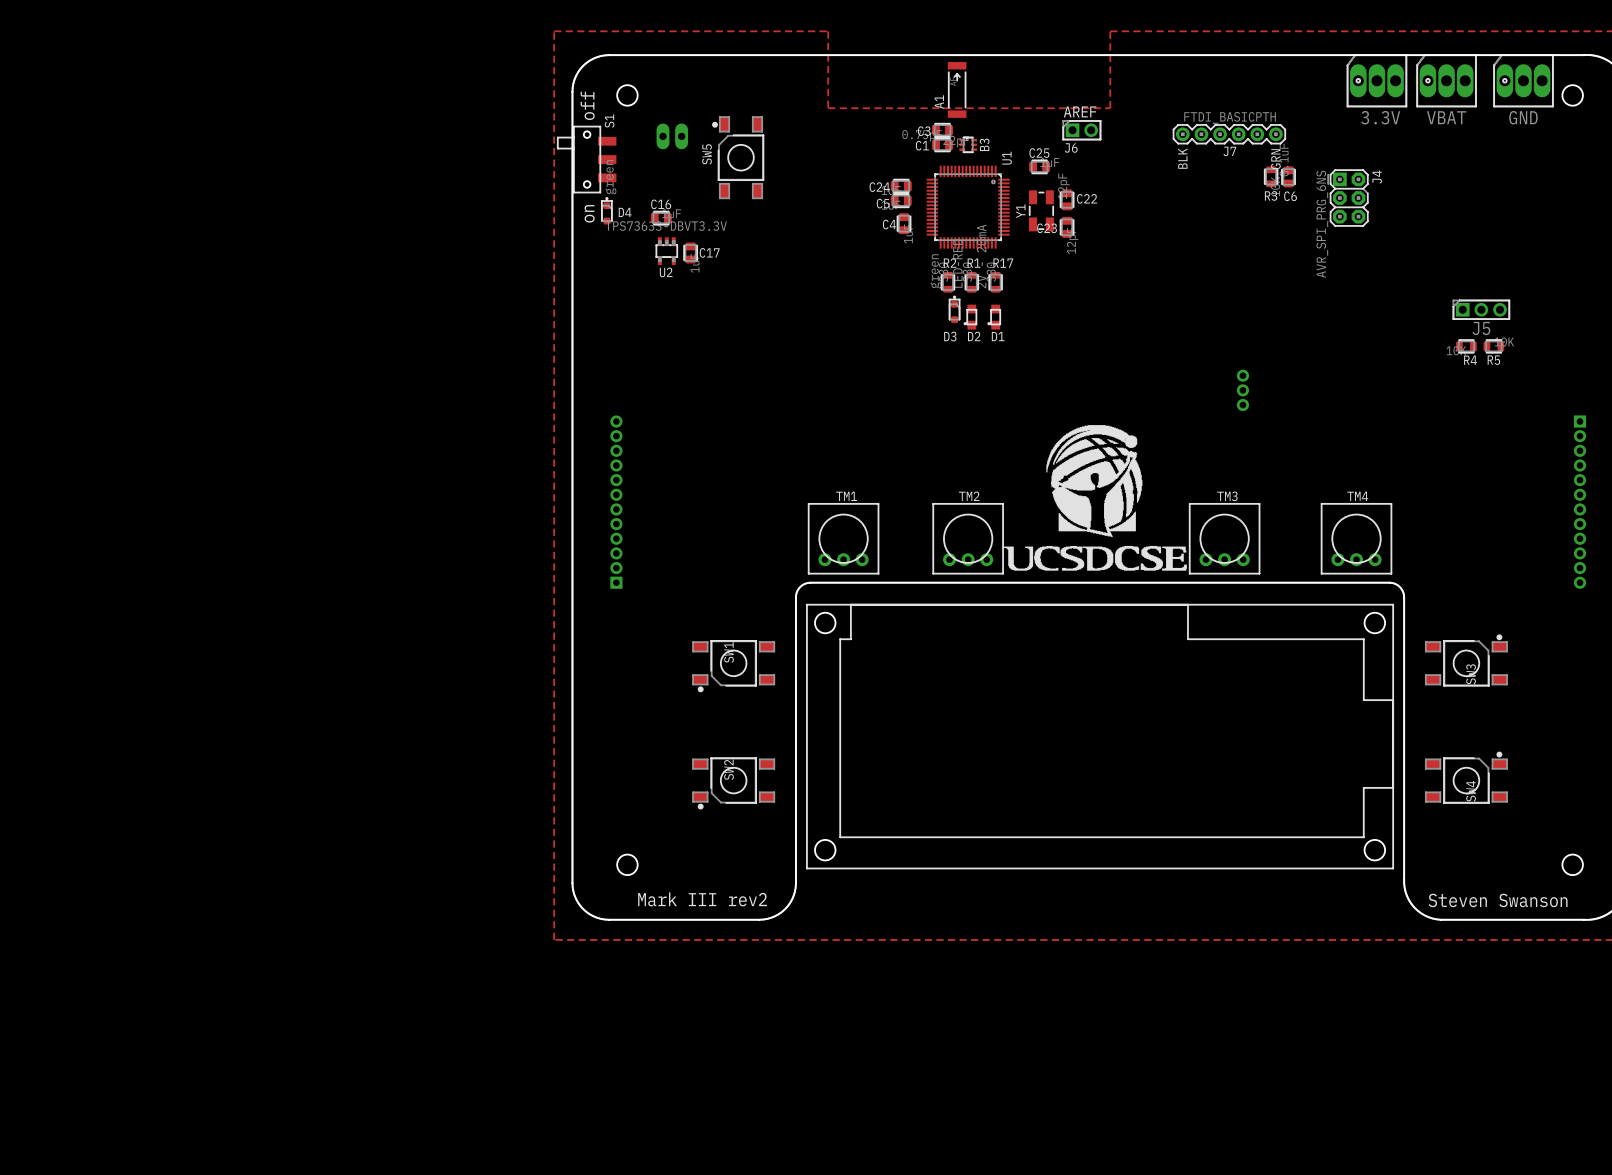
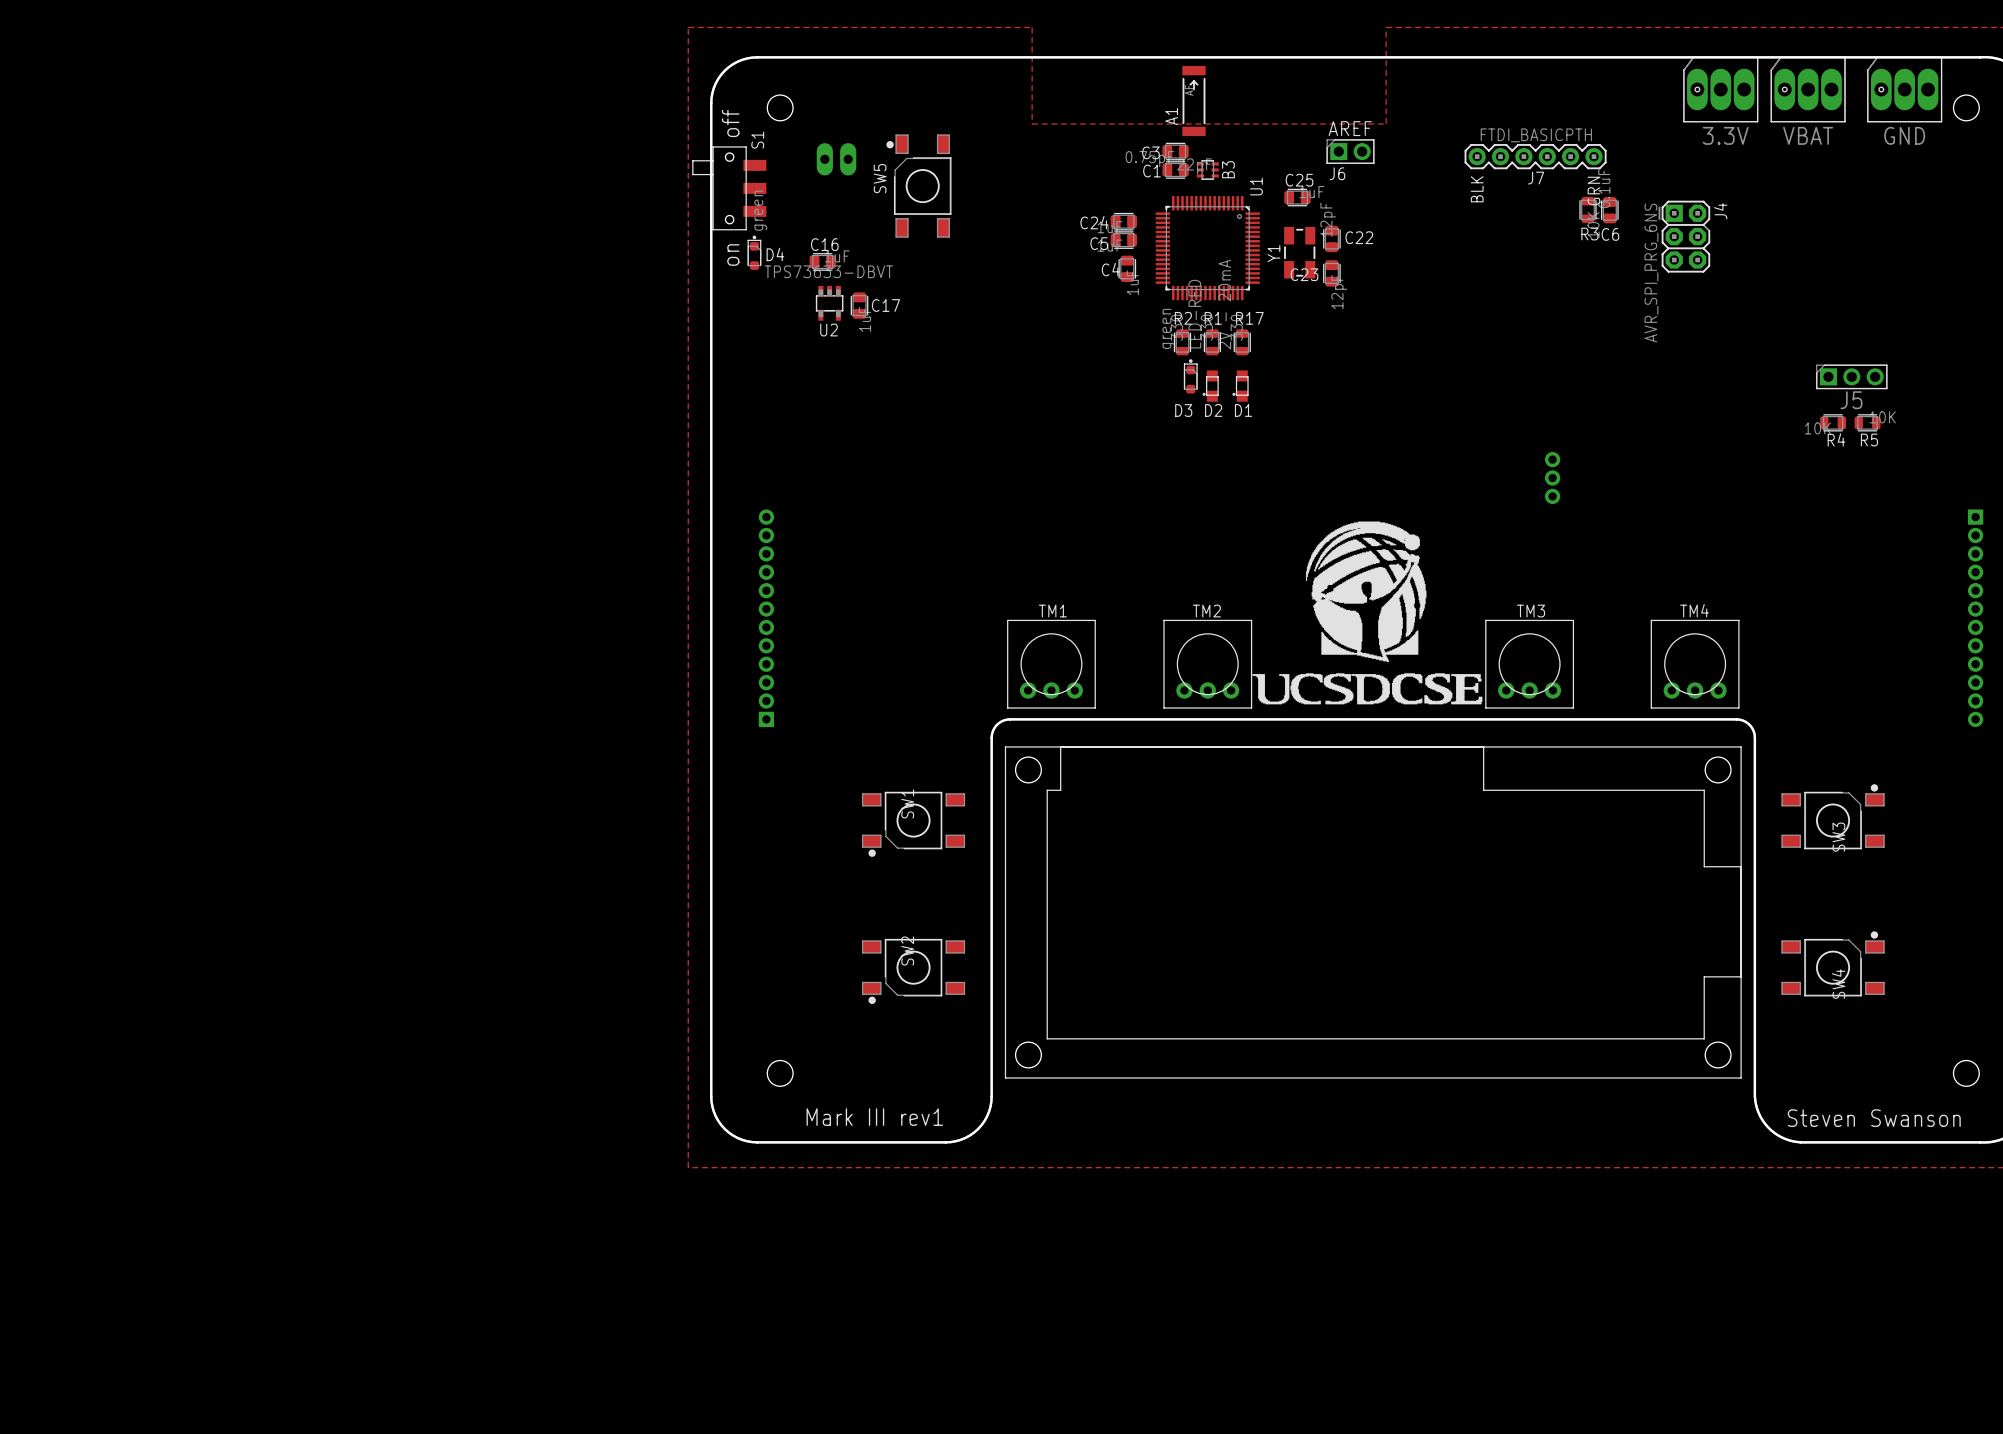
U2 value: TPS73633-DBVT3.3V (666, 226) -> TPS73633-DBVT (828, 271)
text: Mark III rev2 (702, 899) -> Mark III rev1 (874, 1117)

